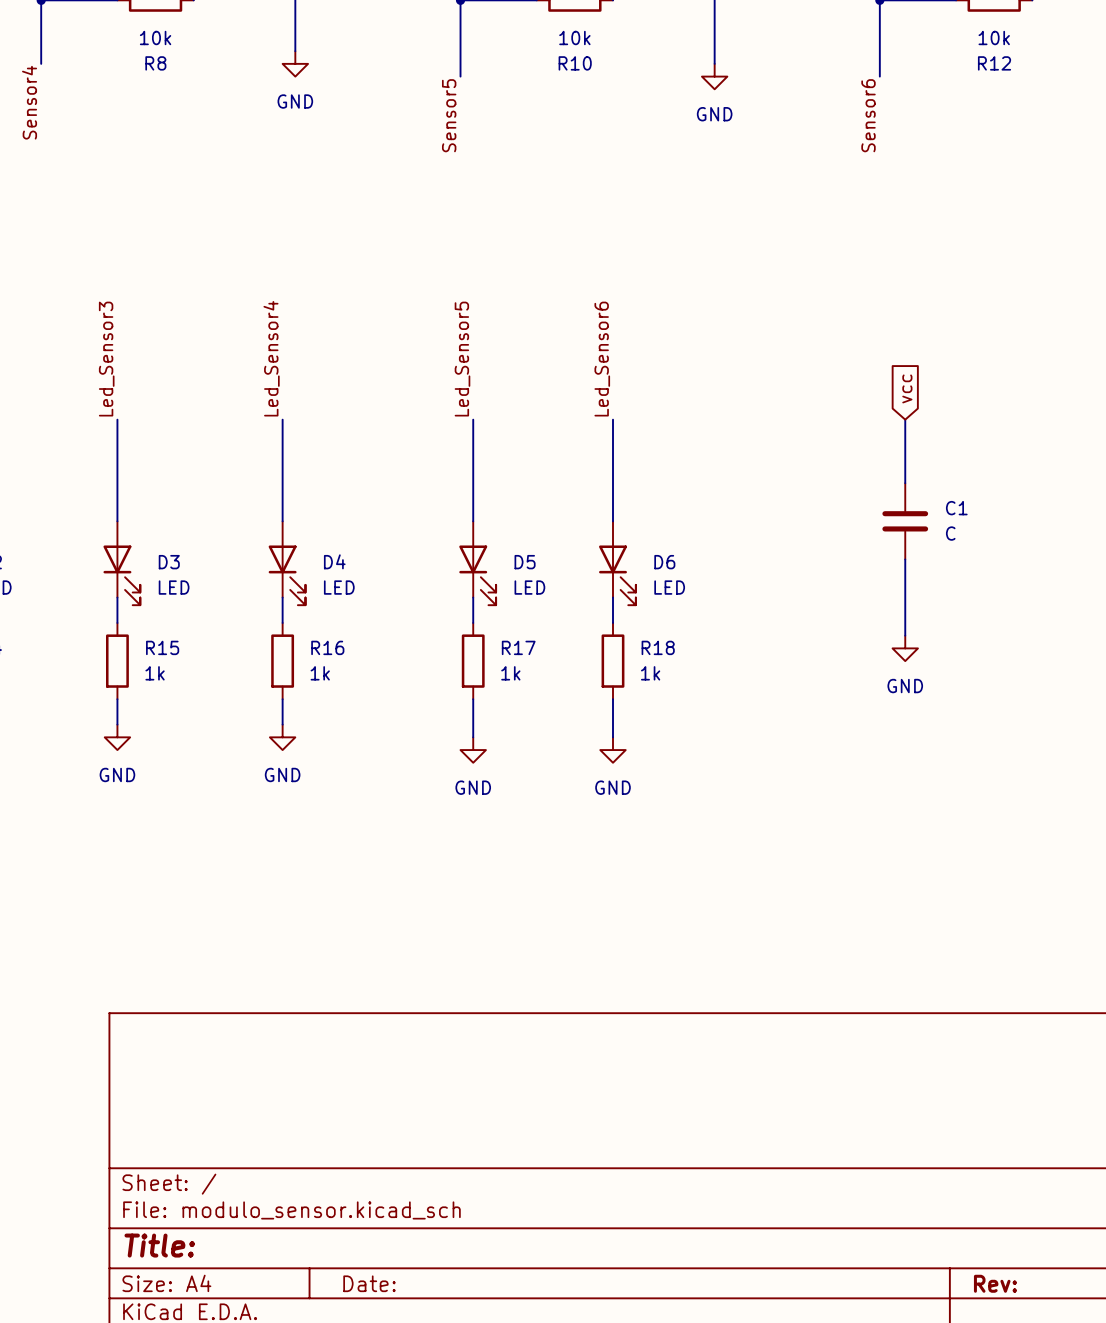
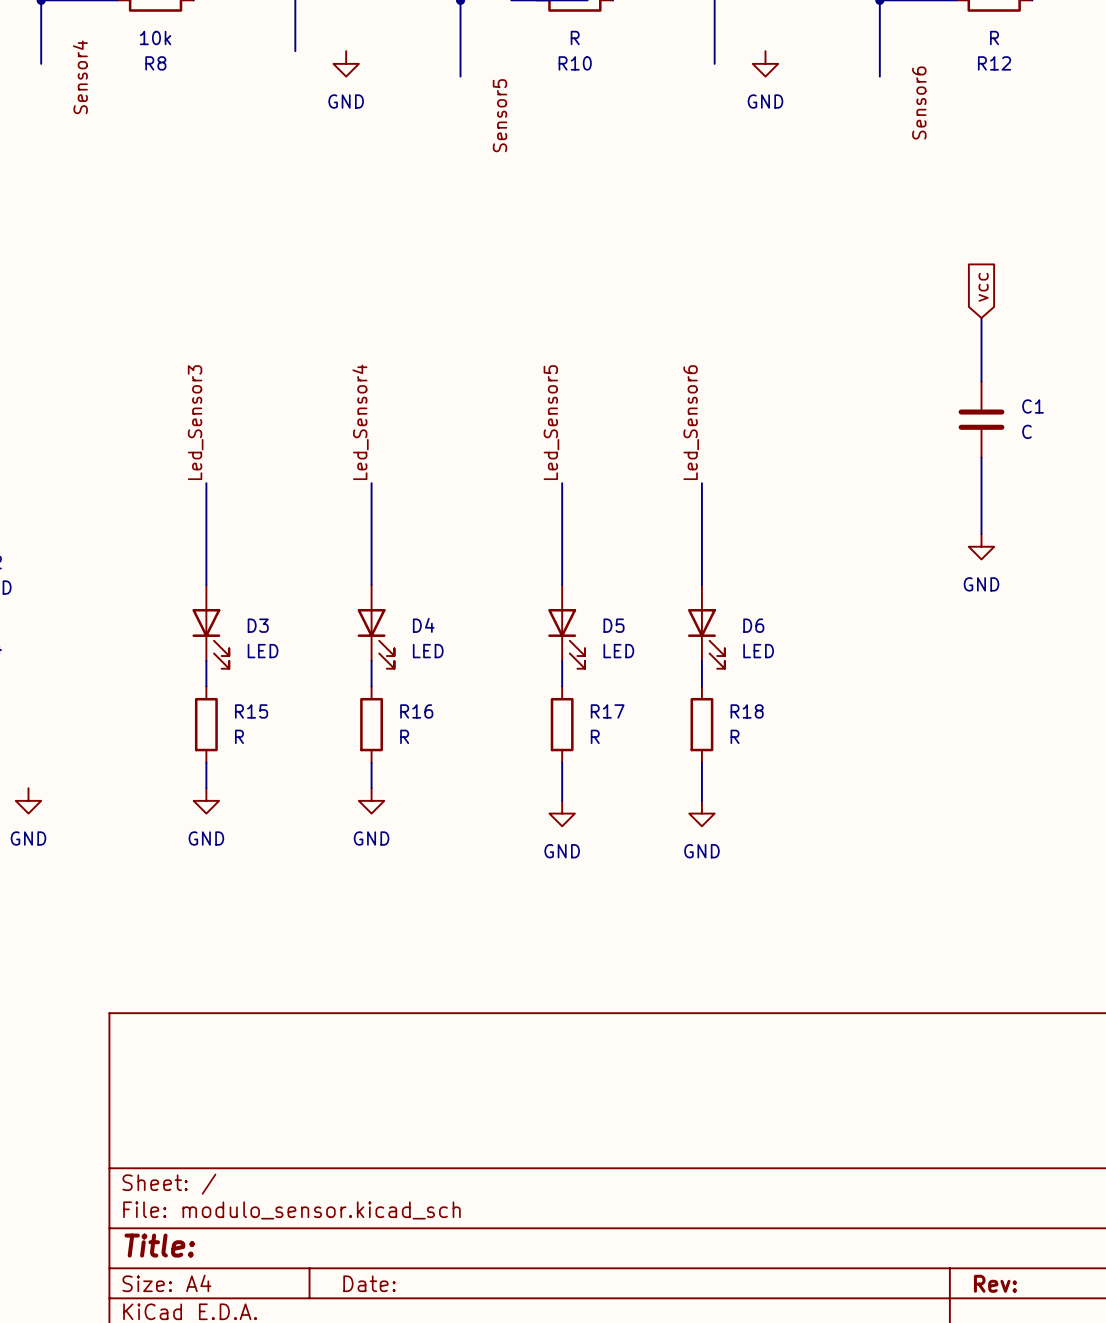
wire: (460, 0) (511, 0) -> (536, 0) (587, 0)
R10 value: 10k (574, 37) -> R (575, 37)
R12 value: 10k (994, 37) -> R (994, 37)
power symbol position: GND (295, 63) -> GND (346, 63)
power symbol position: GND (714, 76) -> GND (765, 63)
label position: Sensor4 (29, 102) -> Sensor4 (80, 77)
label position: Sensor5 (449, 115) -> Sensor5 (500, 115)
label position: Sensor6 (868, 115) -> Sensor6 (919, 103)
label position: Led_Sensor4 (271, 358) -> Led_Sensor4 (360, 422)
label position: Led_Sensor3 (106, 359) -> Led_Sensor3 (195, 422)
label position: Led_Sensor5 (462, 359) -> Led_Sensor5 (551, 422)
label position: Led_Sensor6 (602, 359) -> Led_Sensor6 (691, 422)
global label position: vcc (907, 388) -> vcc (983, 287)
wire: (117, 419) (117, 521) -> (206, 483) (206, 584)
wire: (282, 419) (282, 521) -> (371, 483) (371, 584)
wire: (473, 419) (473, 521) -> (562, 483) (562, 584)
wire: (613, 419) (613, 521) -> (701, 483) (701, 584)
wire: (905, 419) (905, 483) -> (981, 318) (981, 381)
C1 position: (905, 521) -> (981, 419)
wire: (905, 559) (905, 635) -> (981, 457) (981, 534)
D3 position: (121, 563) -> (210, 626)
D4 position: (287, 563) -> (376, 626)
D5 position: (477, 563) -> (566, 626)
D6 position: (617, 563) -> (706, 626)
wire: (117, 597) (117, 622) -> (206, 661) (206, 686)
wire: (282, 597) (282, 622) -> (371, 661) (371, 686)
wire: (473, 597) (473, 622) -> (562, 661) (562, 686)
wire: (613, 597) (613, 622) -> (701, 661) (701, 686)
power symbol position: GND (905, 648) -> GND (981, 546)
R15 position: (117, 661) -> (206, 724)
R16 position: (282, 661) -> (371, 724)
R17 position: (473, 661) -> (562, 724)
R18 position: (613, 661) -> (701, 724)
R15 value: 1k (155, 673) -> R (239, 736)
R16 value: 1k (320, 673) -> R (404, 736)
R17 value: 1k (510, 673) -> R (595, 736)
R18 value: 1k (650, 673) -> R (735, 736)
wire: (117, 699) (117, 724) -> (206, 762) (206, 788)
wire: (282, 699) (282, 724) -> (371, 762) (371, 788)
wire: (473, 699) (473, 737) -> (562, 762) (562, 800)
wire: (613, 699) (613, 737) -> (701, 762) (701, 800)
power symbol: GND (117, 737) -> none
power symbol: GND (282, 737) -> none
power symbol: GND (473, 750) -> none
power symbol: GND (613, 750) -> none
power symbol: none -> GND (28, 800)
power symbol: none -> GND (206, 800)
power symbol: none -> GND (371, 800)
power symbol: none -> GND (562, 813)
power symbol: none -> GND (701, 813)

